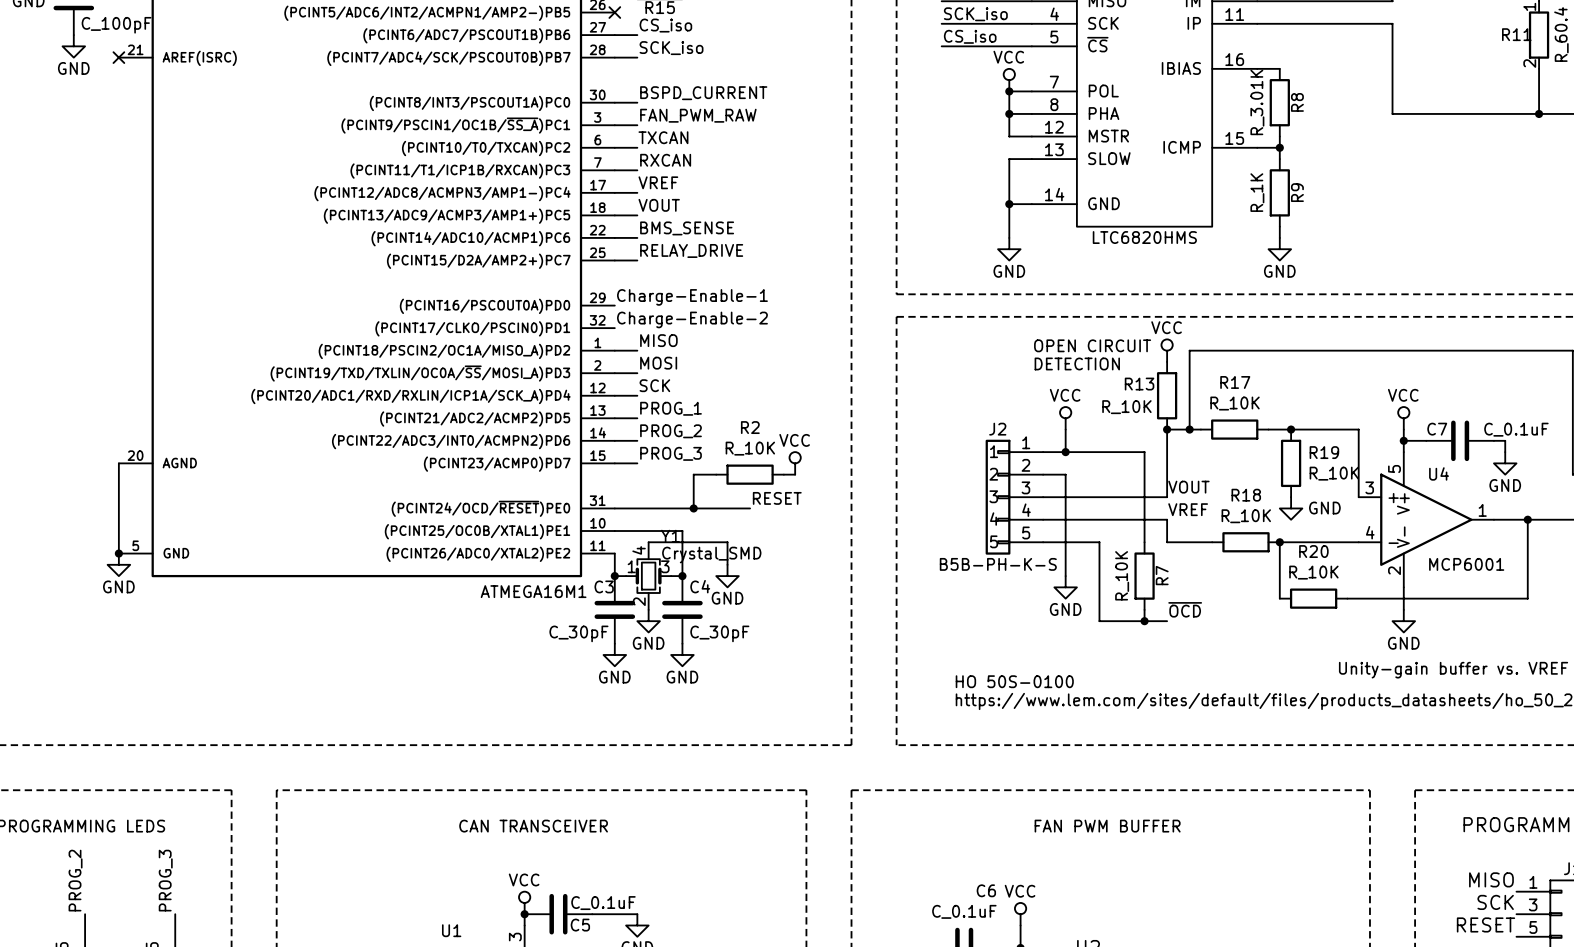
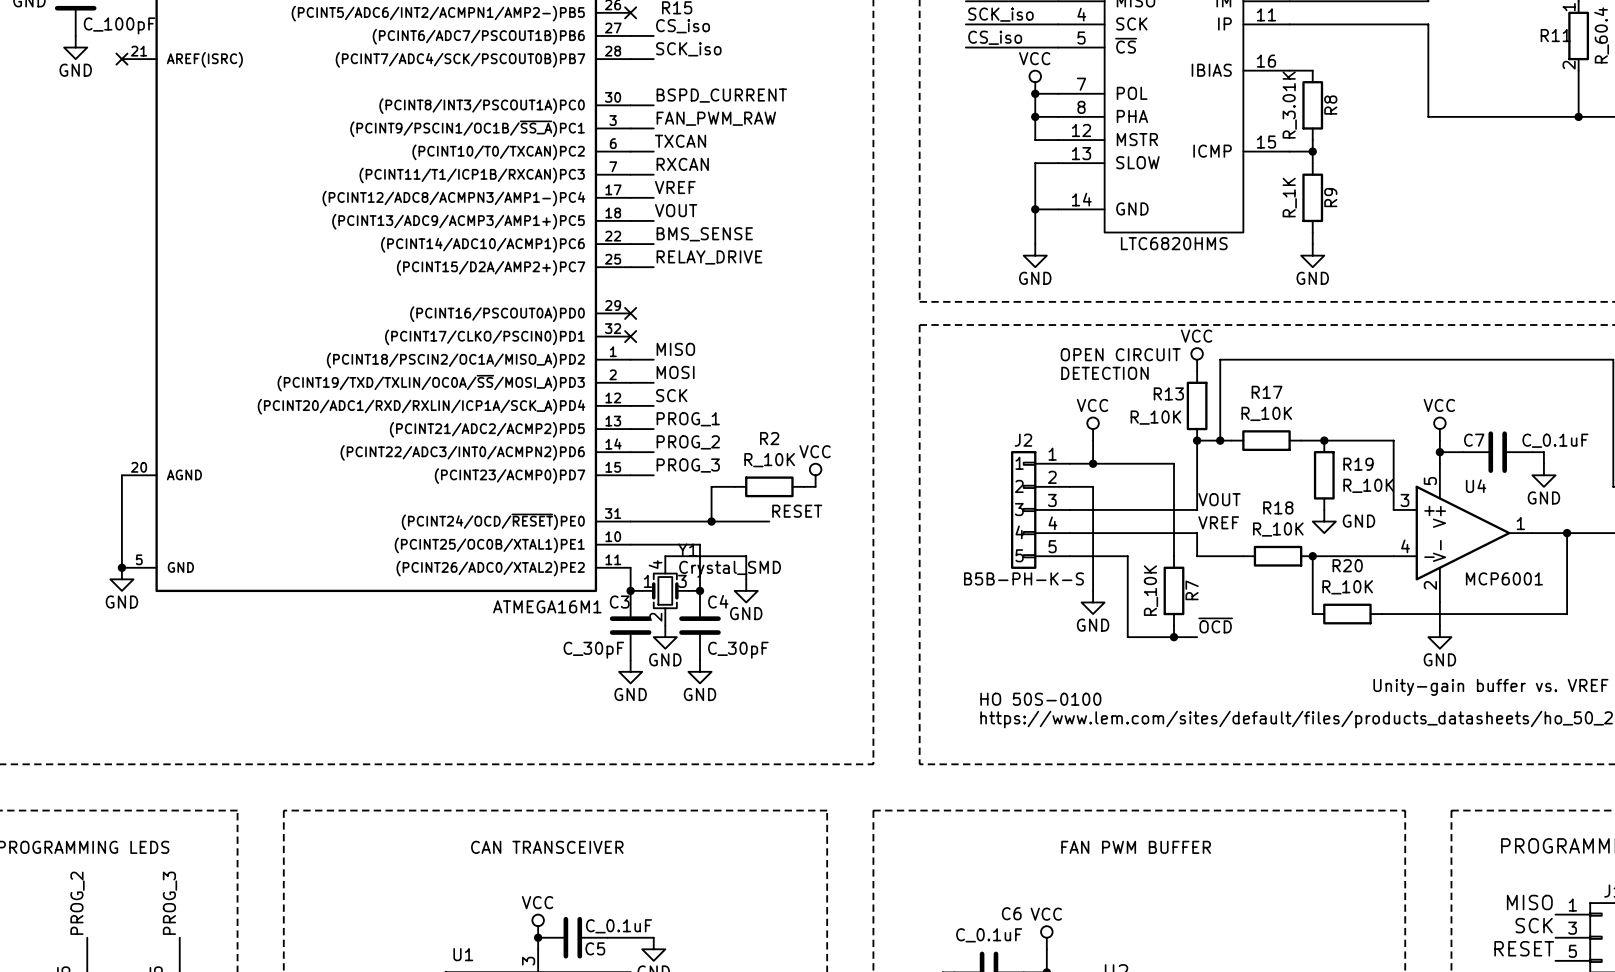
label: Charge-Enable-1 (692, 297) -> none
no-connect mark: none -> (630, 313)
label: Charge-Enable-2 (692, 319) -> none
no-connect mark: none -> (630, 336)

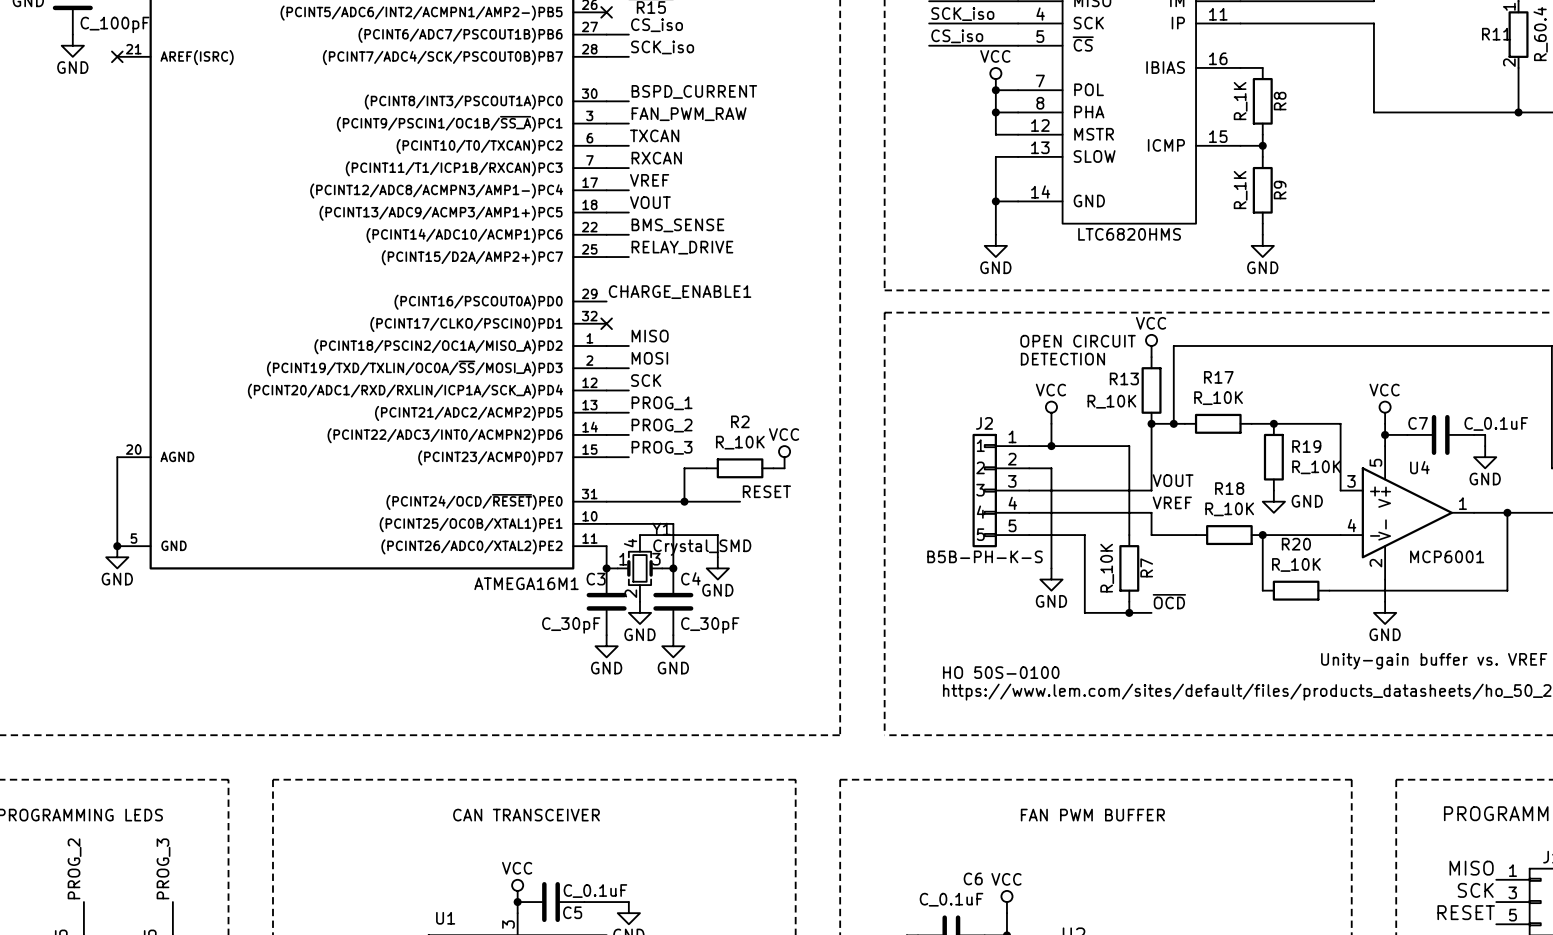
R8 value: R_3.01K (1289, 105) -> R_1K (1240, 101)
label: none -> CHARGE_ENABLE1 (680, 292)
no-connect mark: (630, 313) -> none

